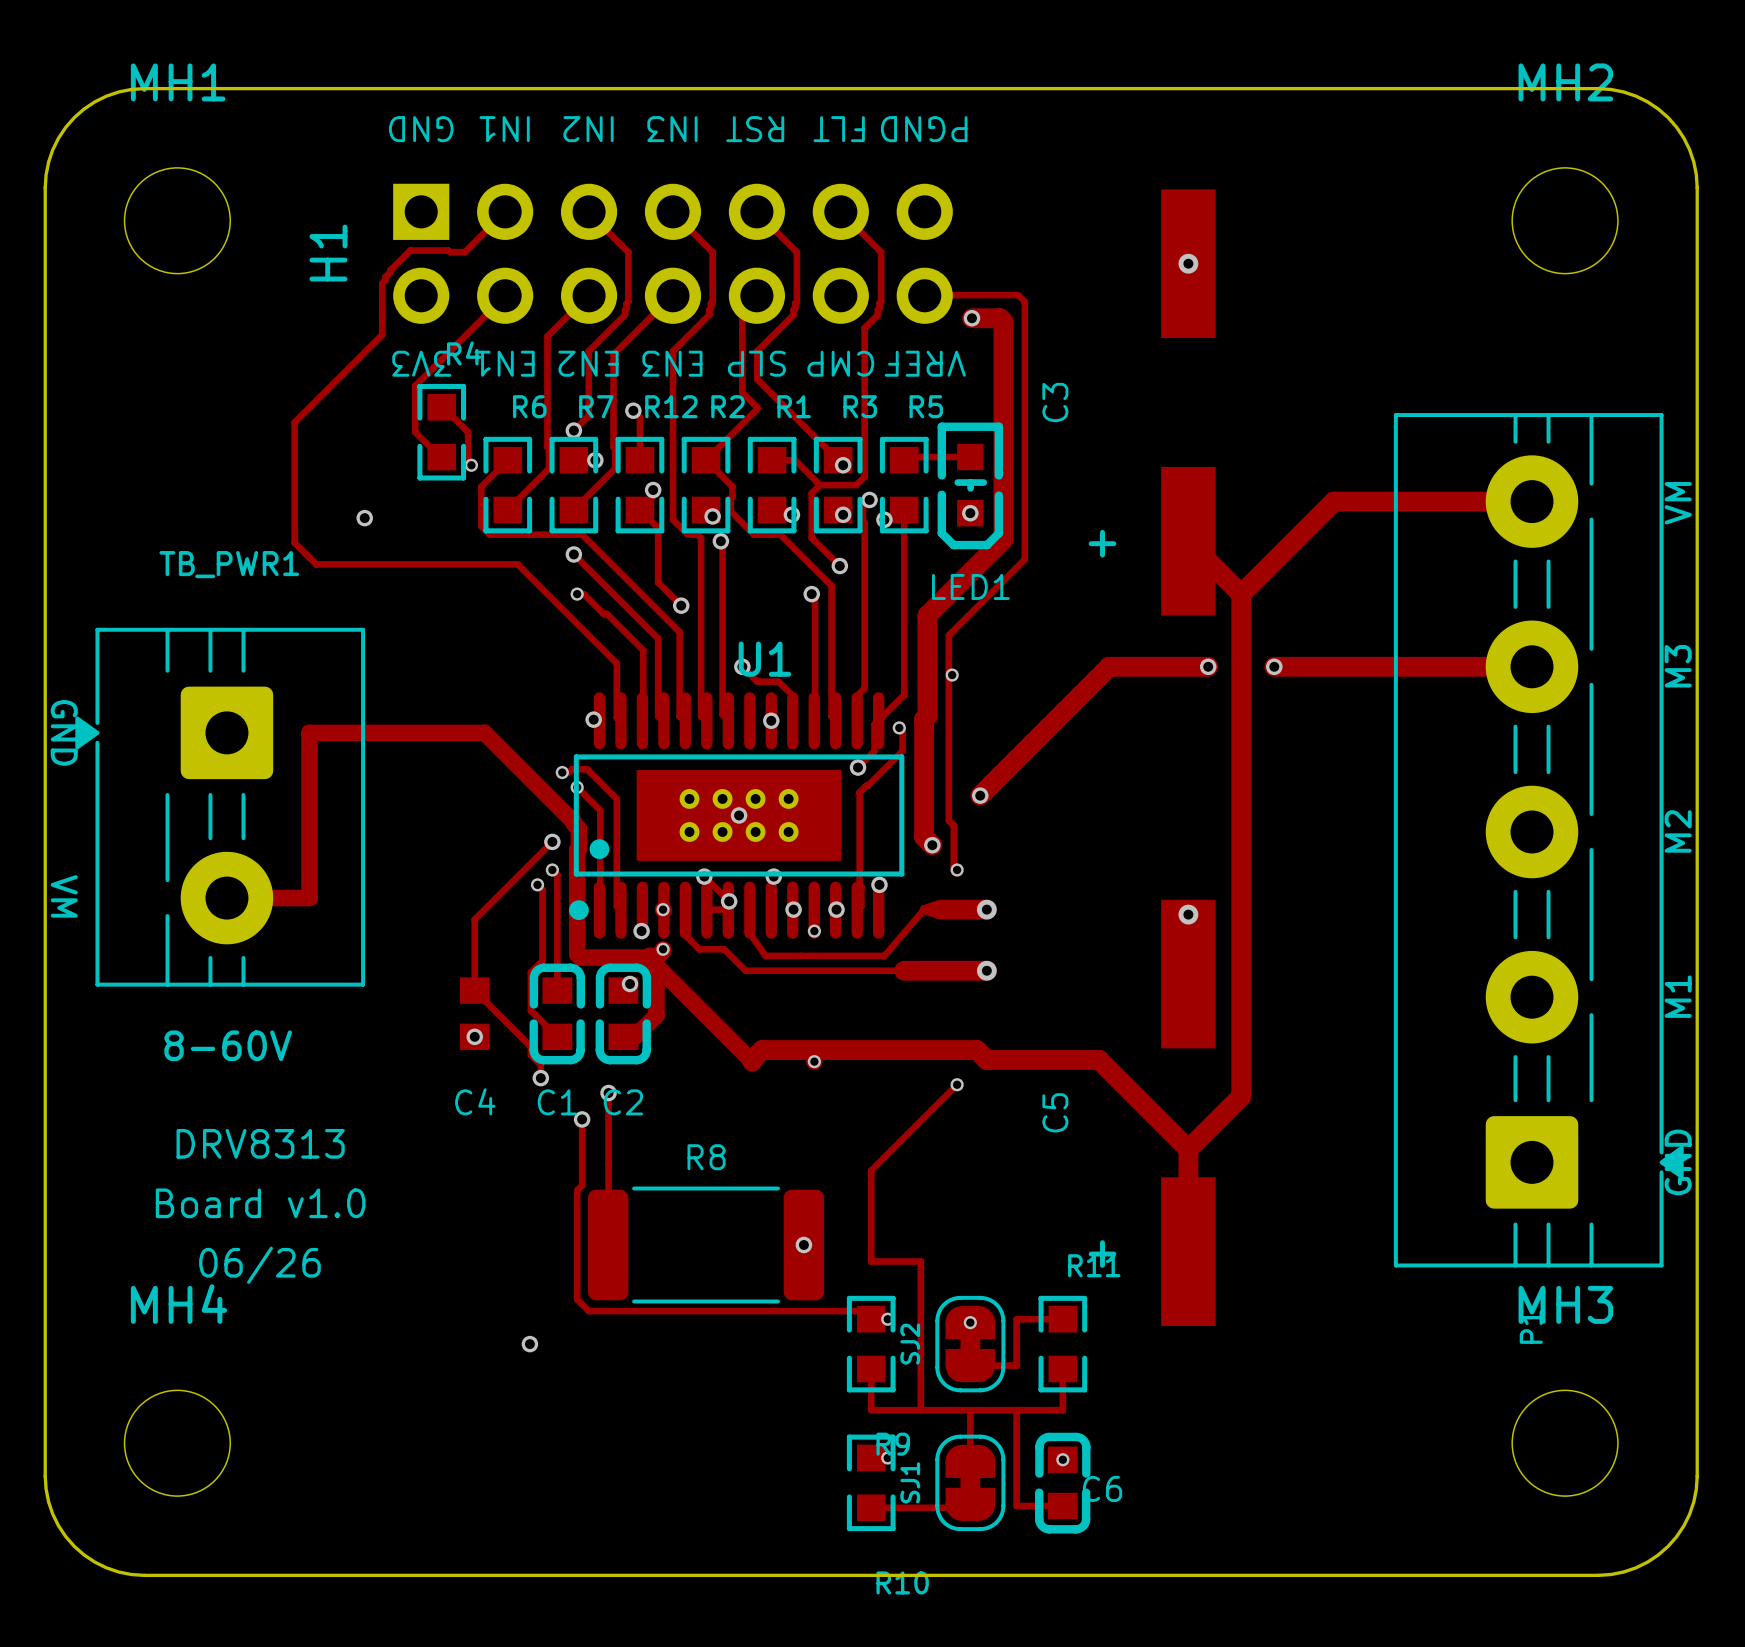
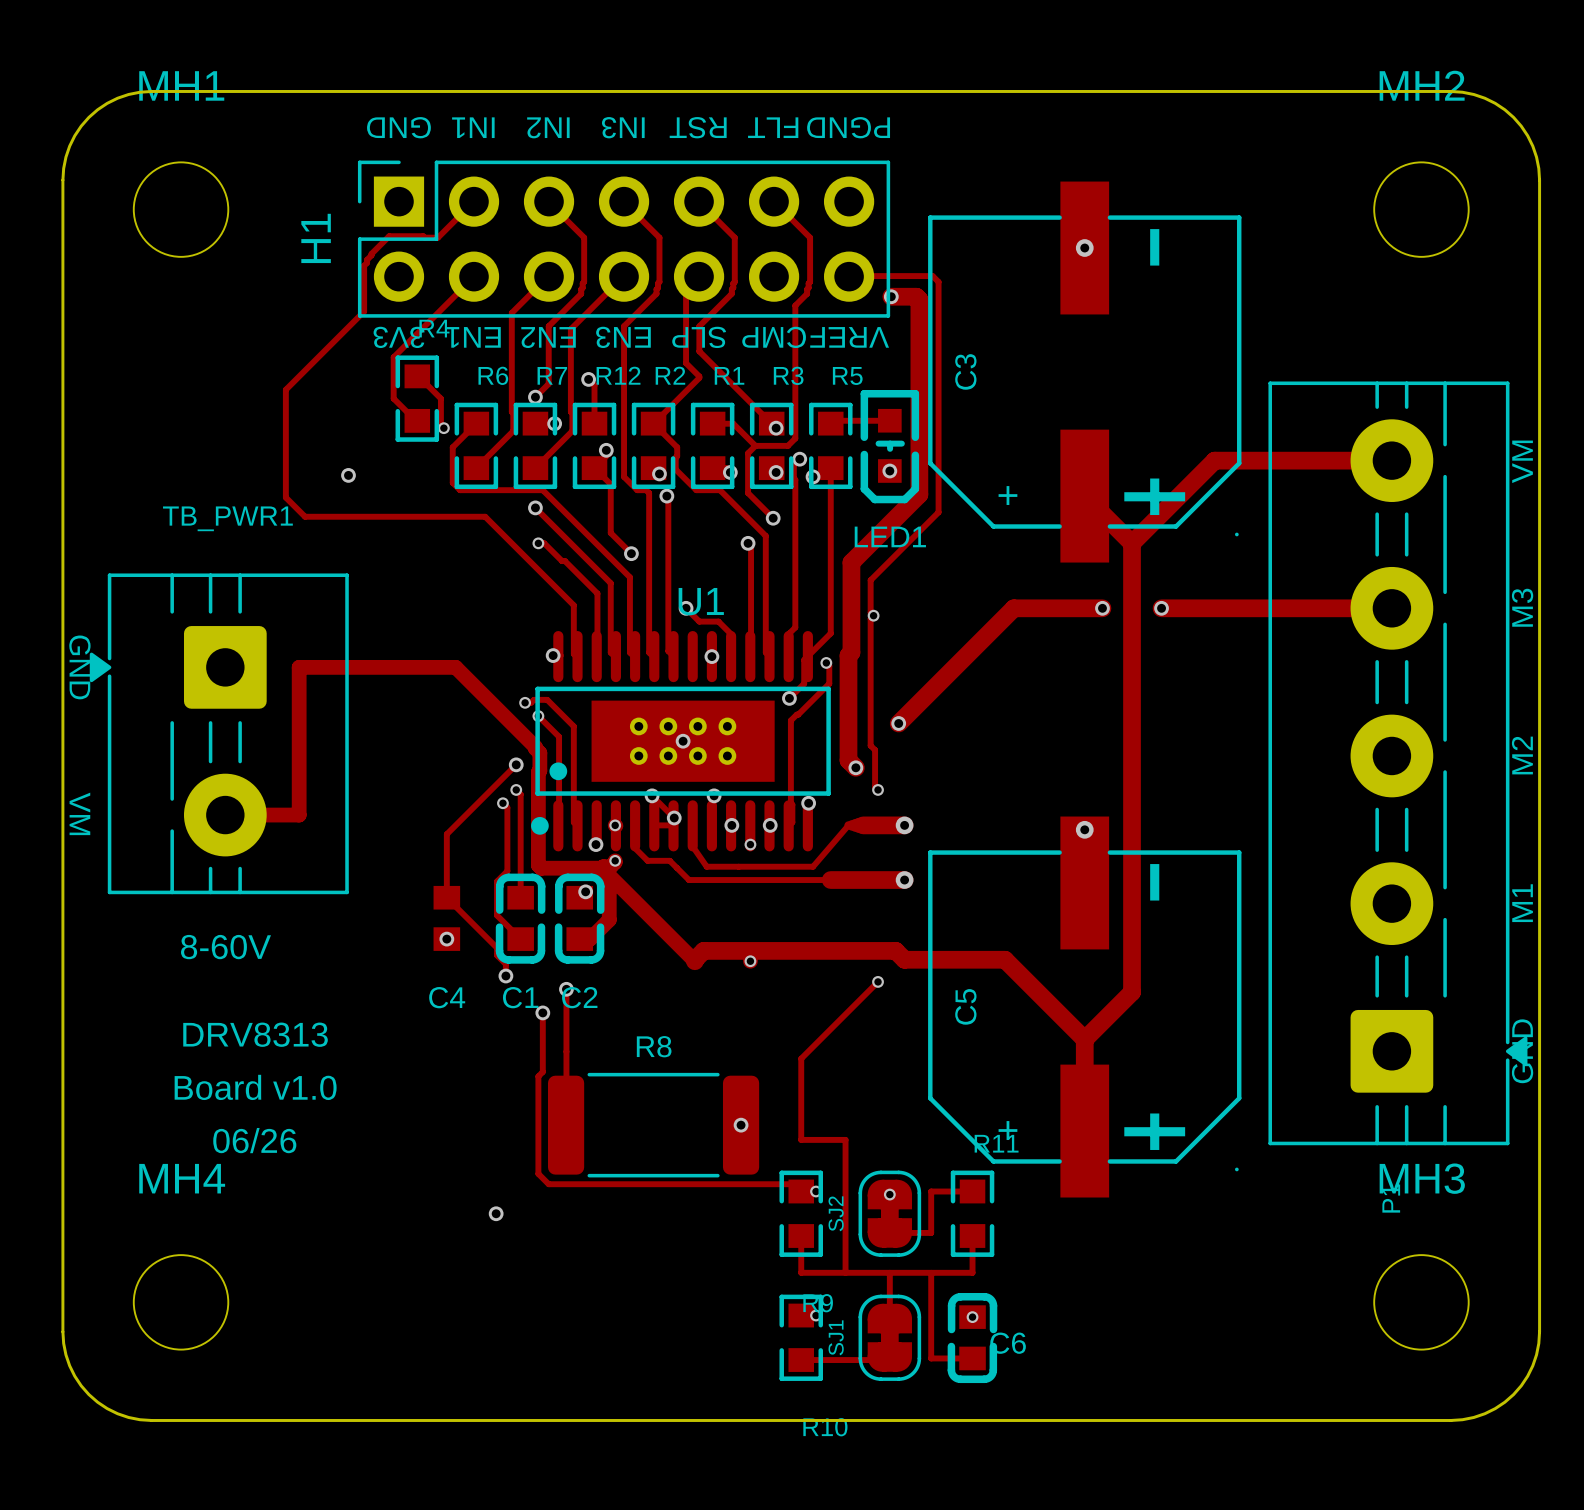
H1 footprint: [393, 183, 953, 324] -> [357, 160, 891, 318]
C3 footprint: [1161, 189, 1216, 616] -> [928, 181, 1242, 563]
C5 footprint: [1161, 899, 1216, 1326] -> [928, 816, 1242, 1198]

